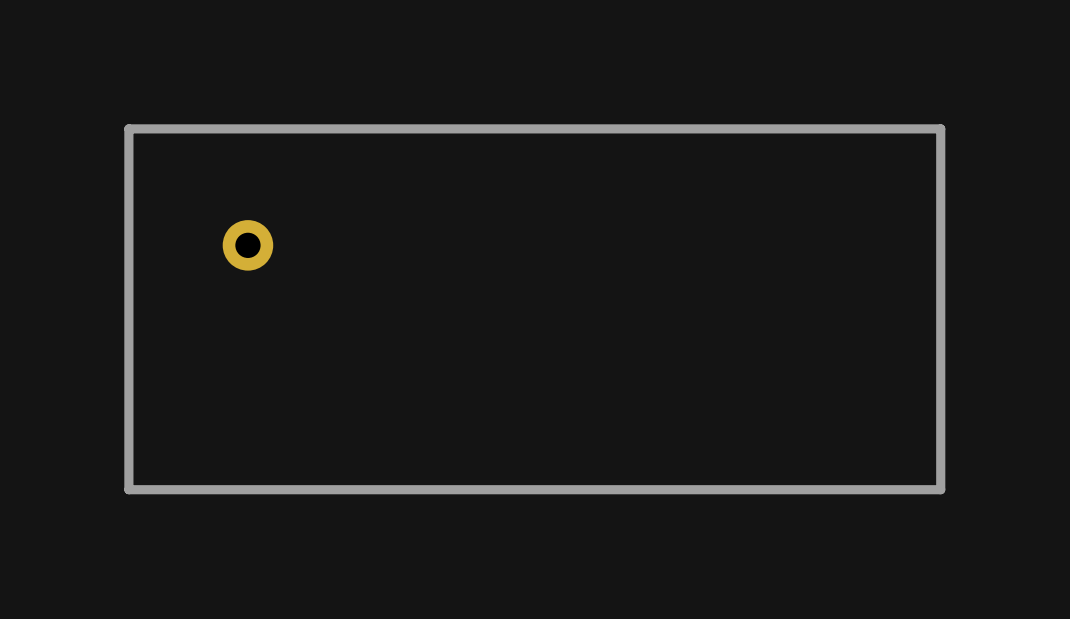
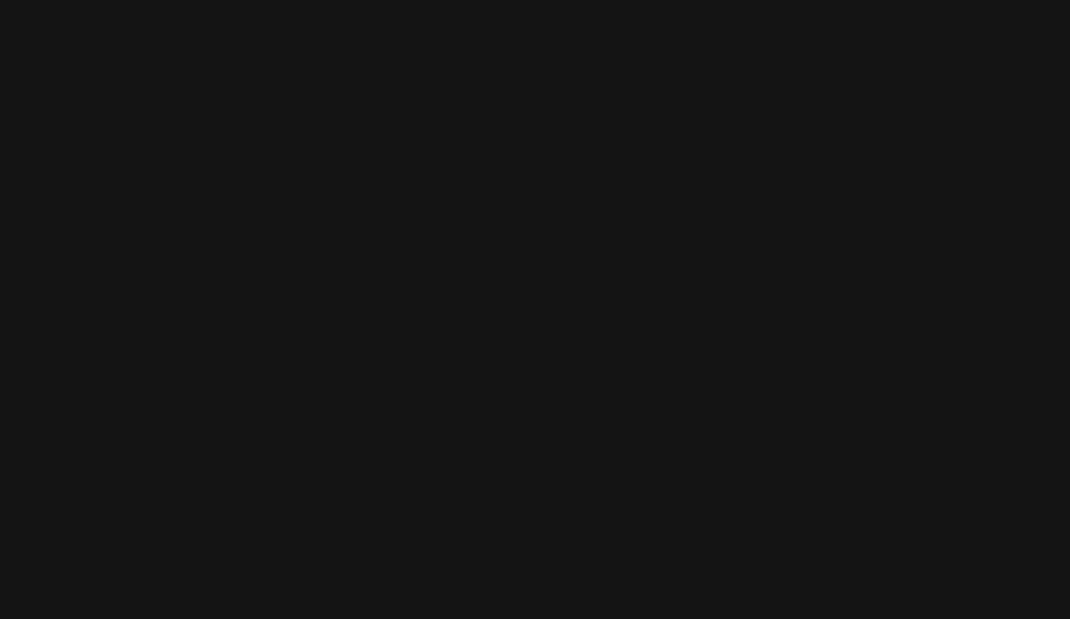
board edge: (940, 128) (128, 128) (128, 489) (940, 489) (940, 128) -> none
part: (247, 245) -> none

